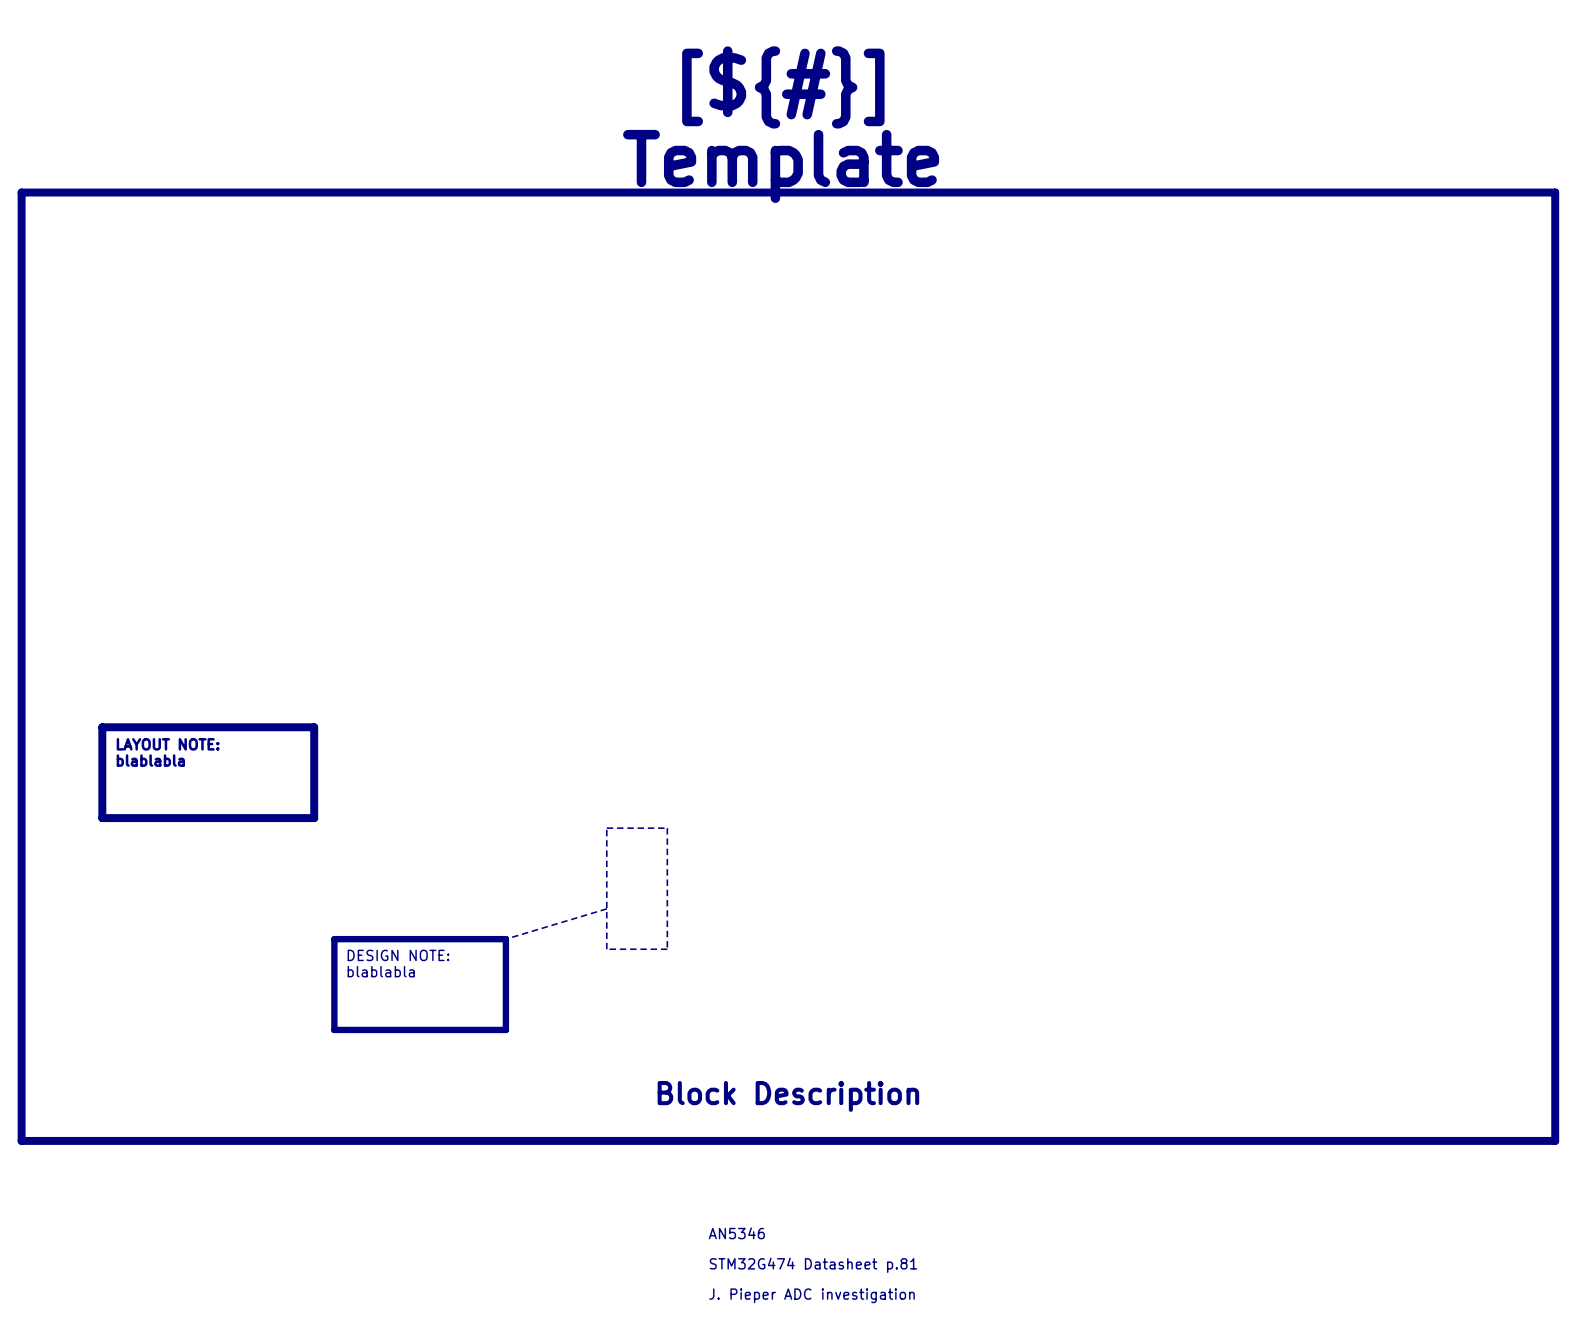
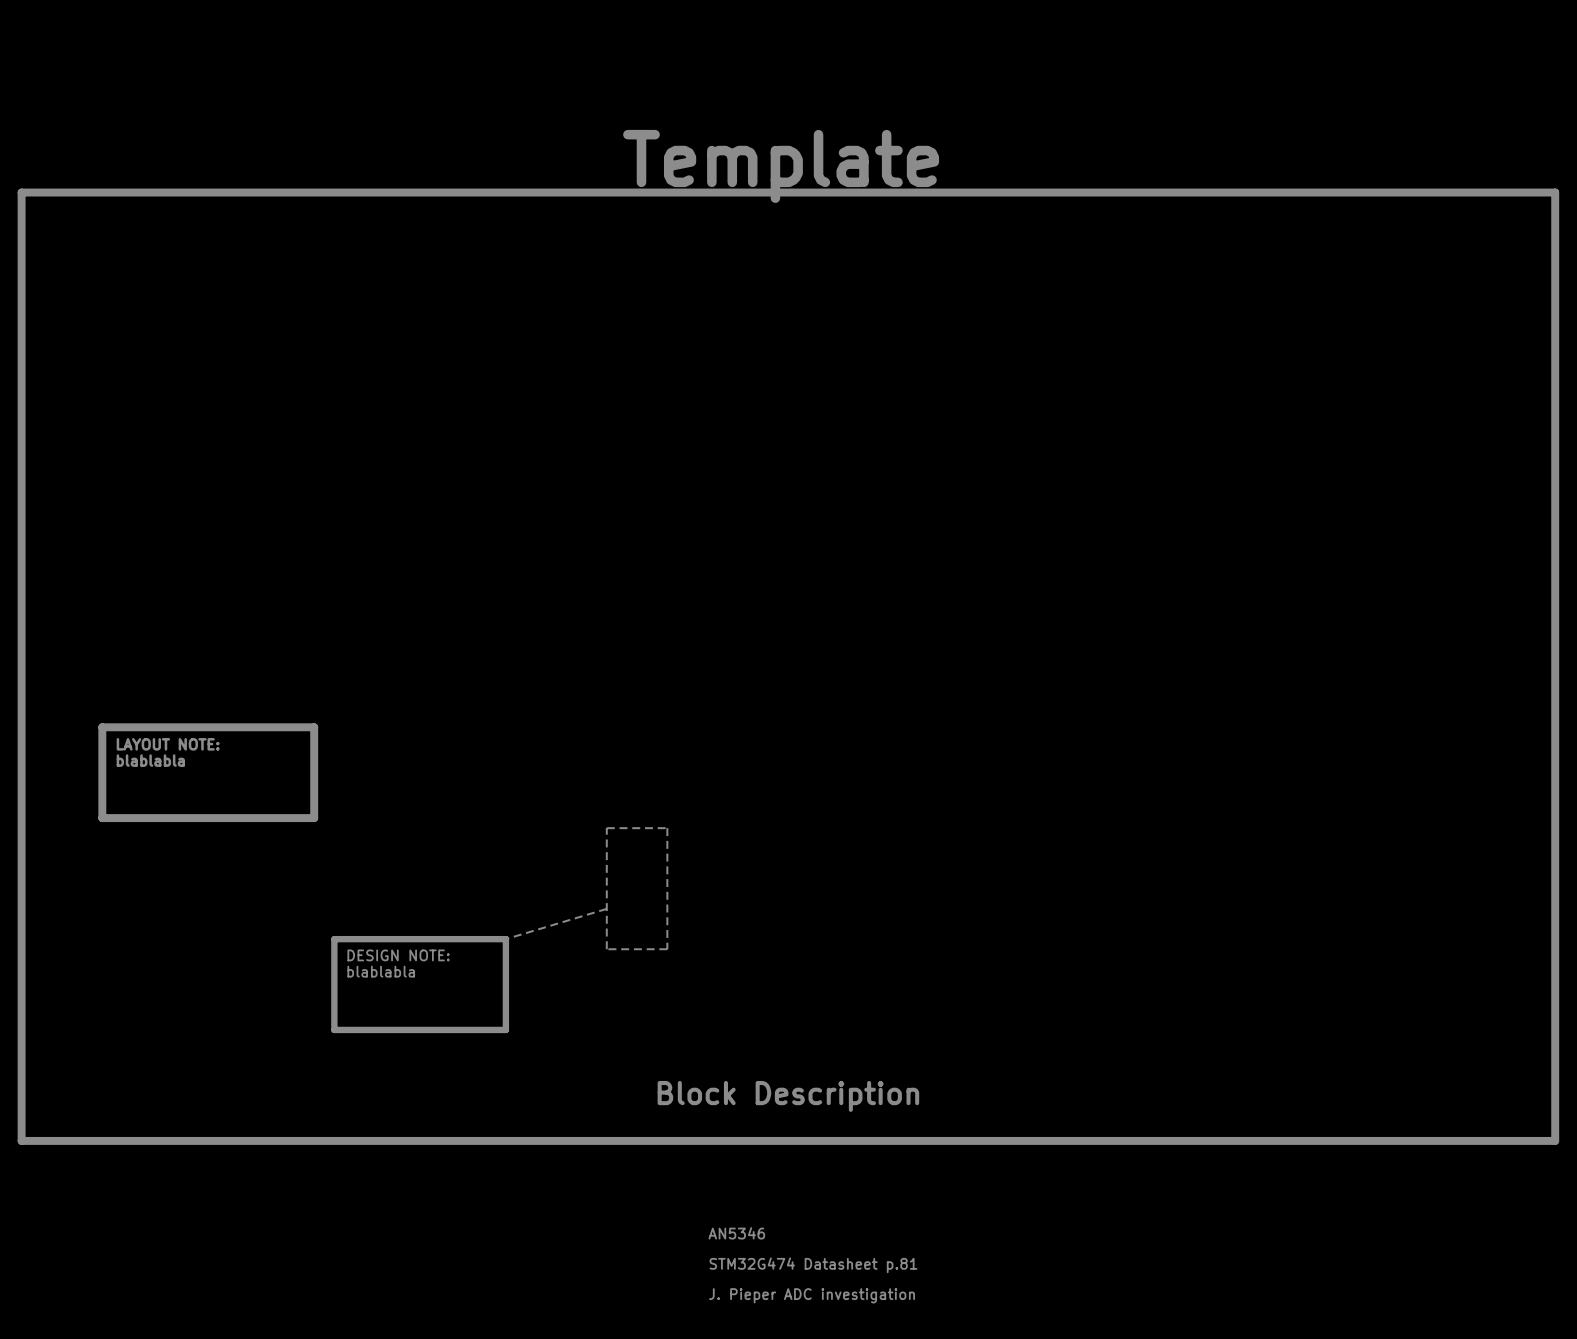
text: [${#}] (783, 87) -> none

